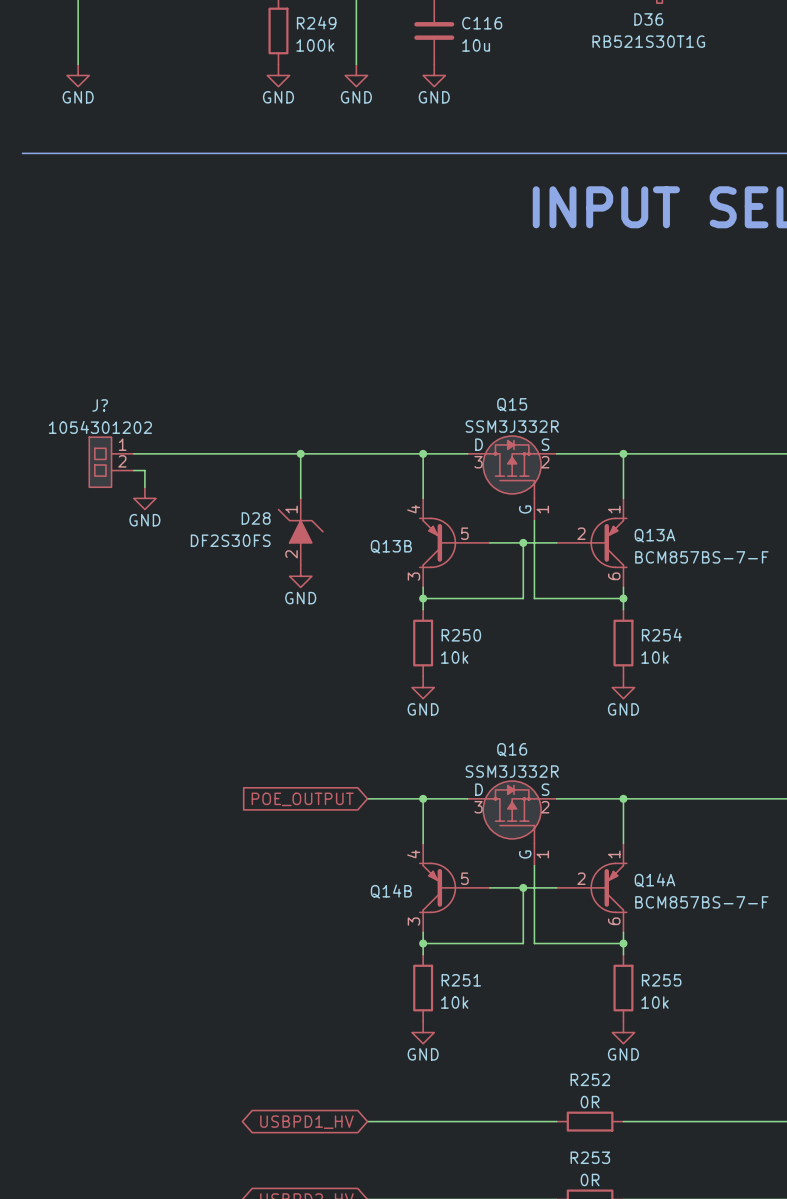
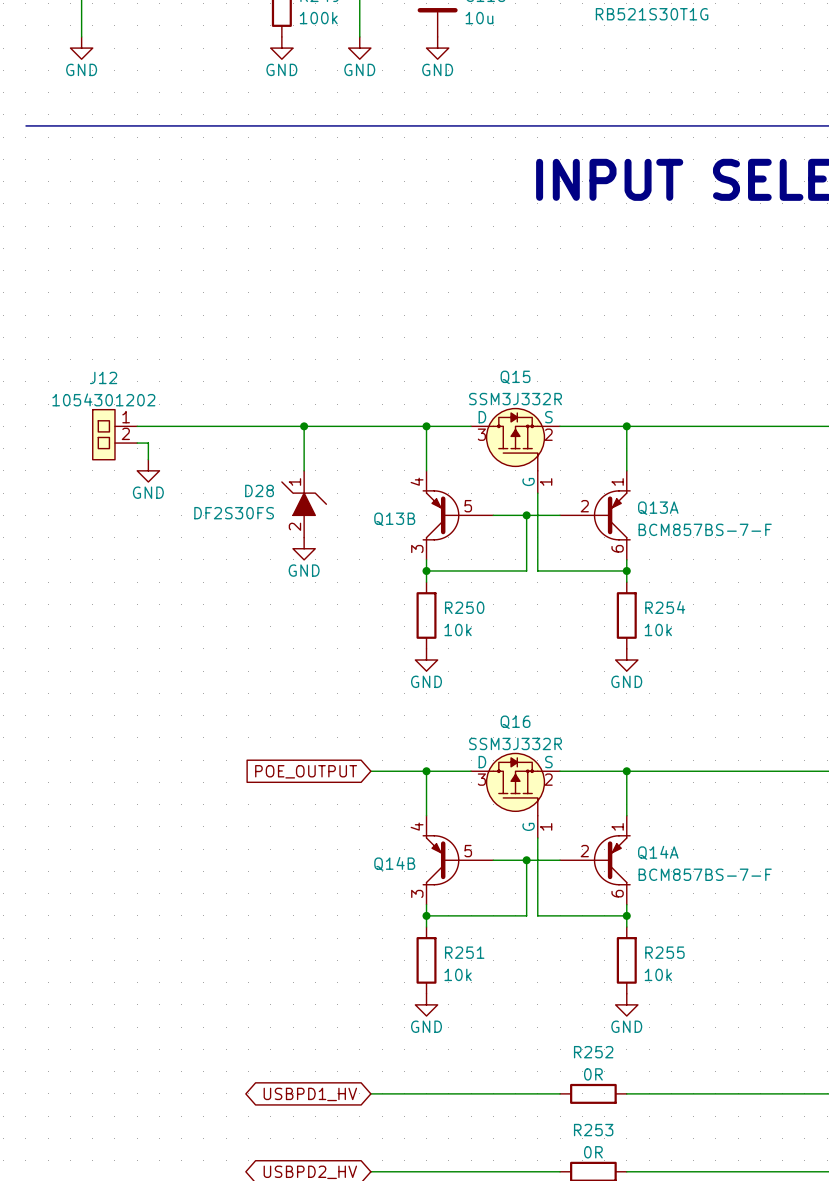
J? name: J? (100, 405) -> J12 (103, 377)

